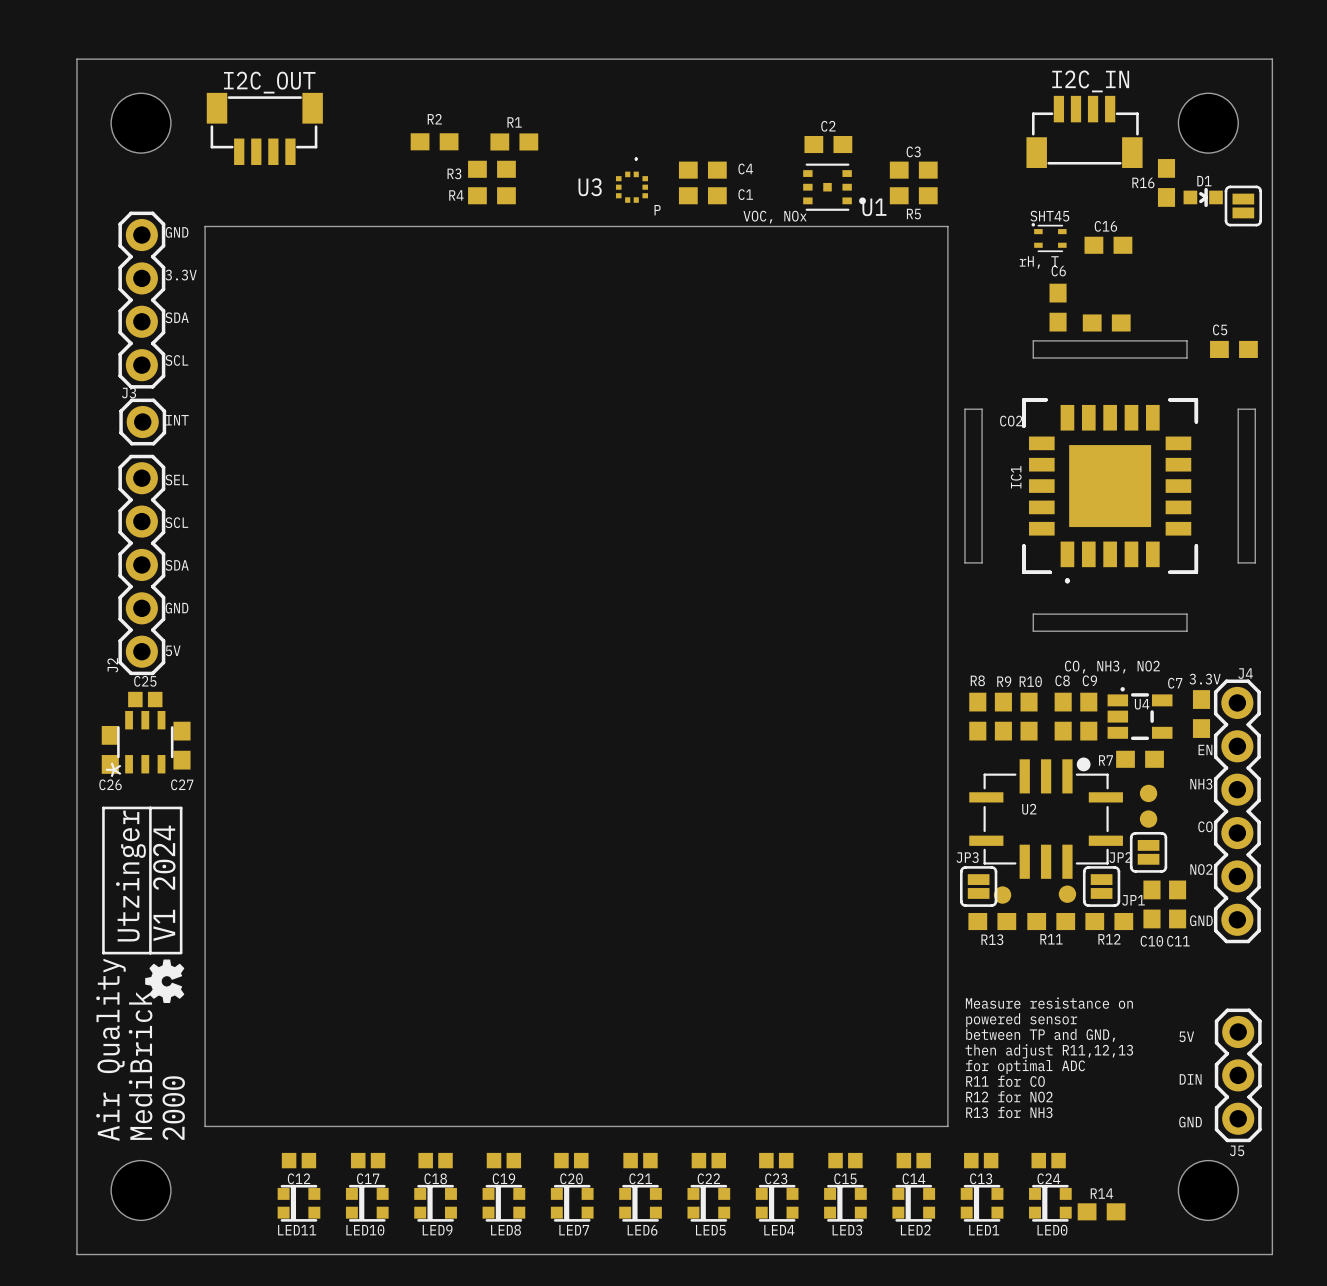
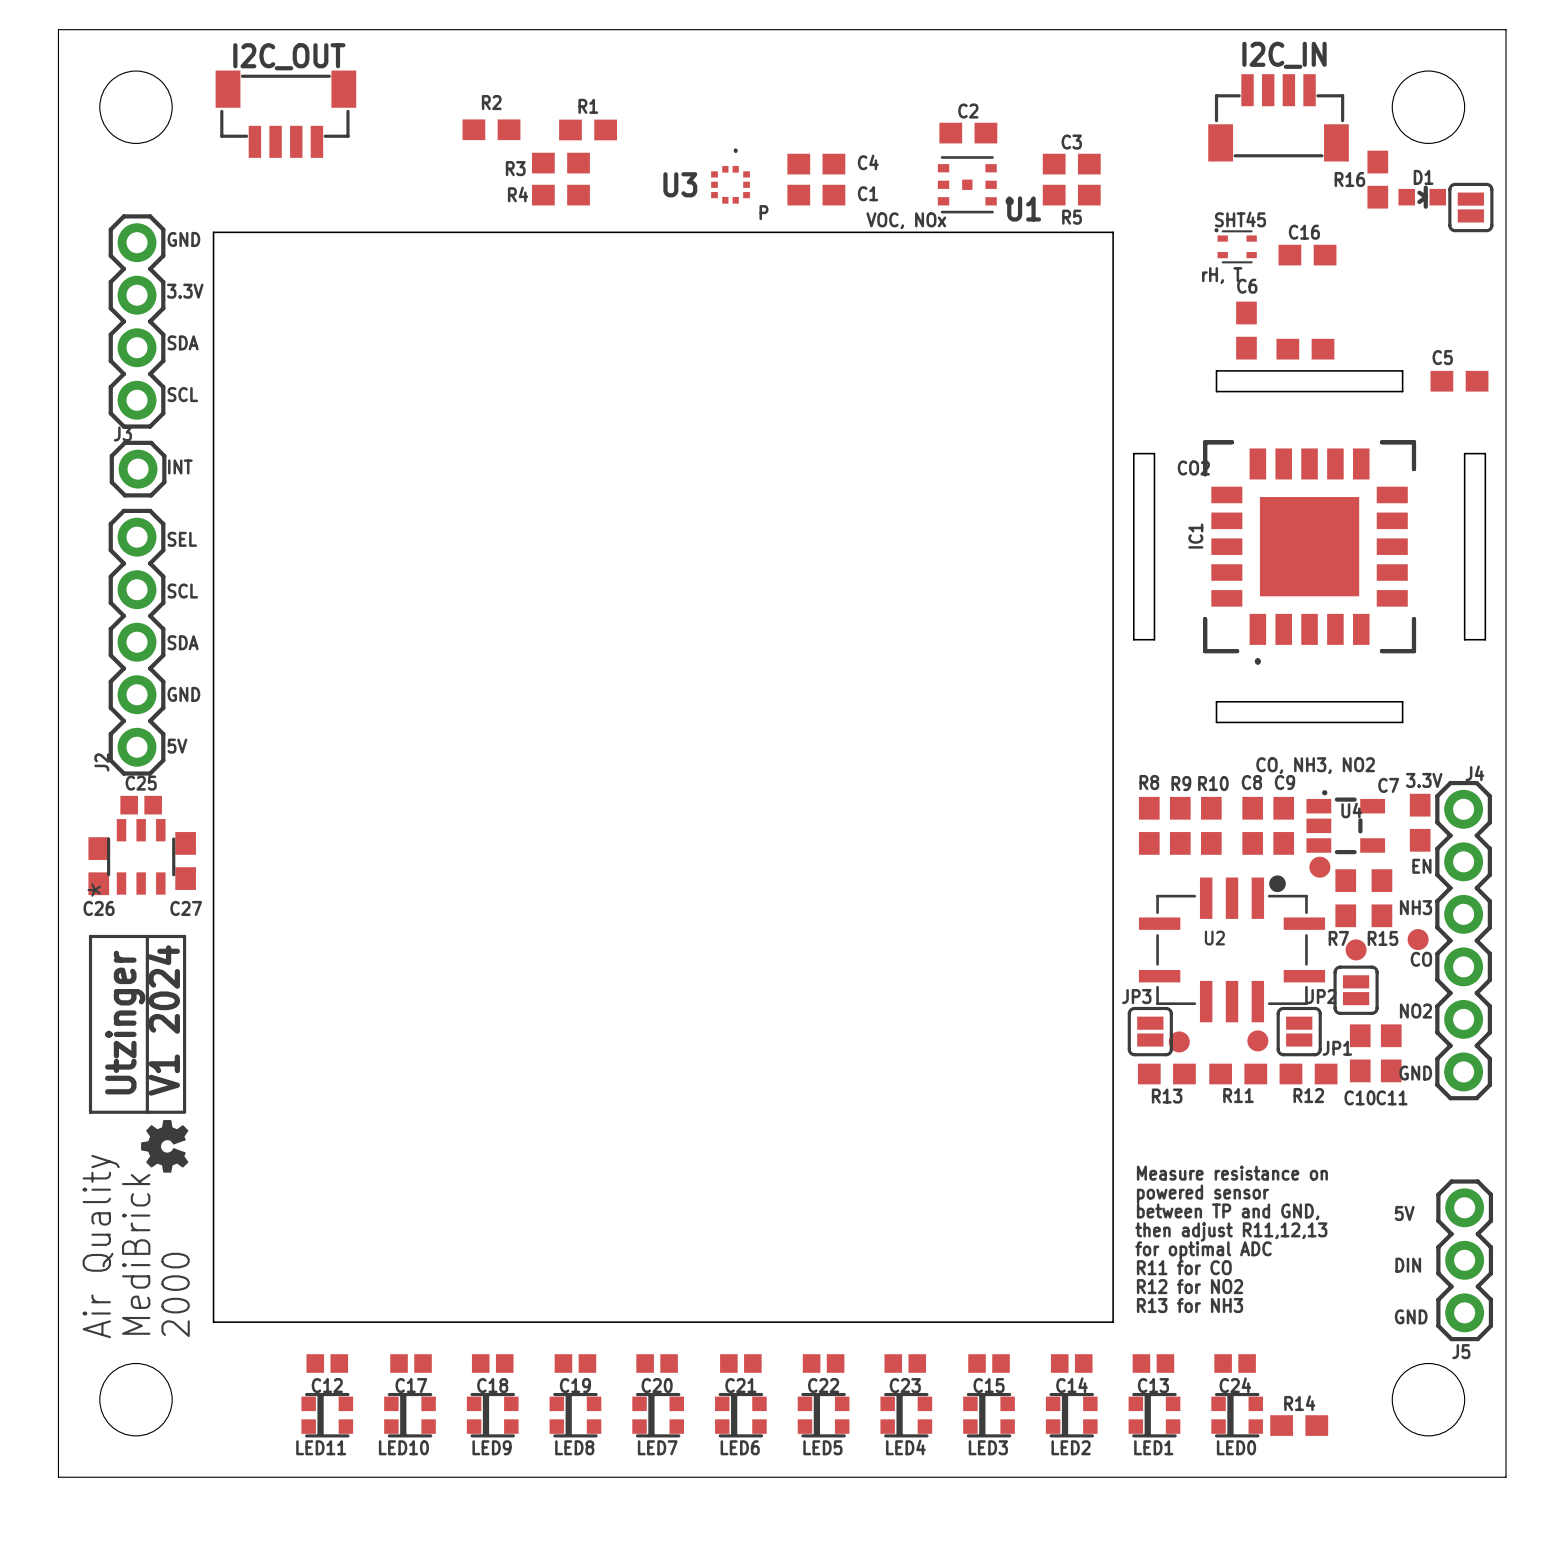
part: none -> (1319, 867)
R7 rotation: 0° (1140, 759) -> 90° clockwise (1345, 898)
R7 name position: R7 (1106, 760) -> R7 (1338, 938)
R15: none -> (1381, 898)
part: (1148, 793) -> none
part: none -> (1418, 939)

